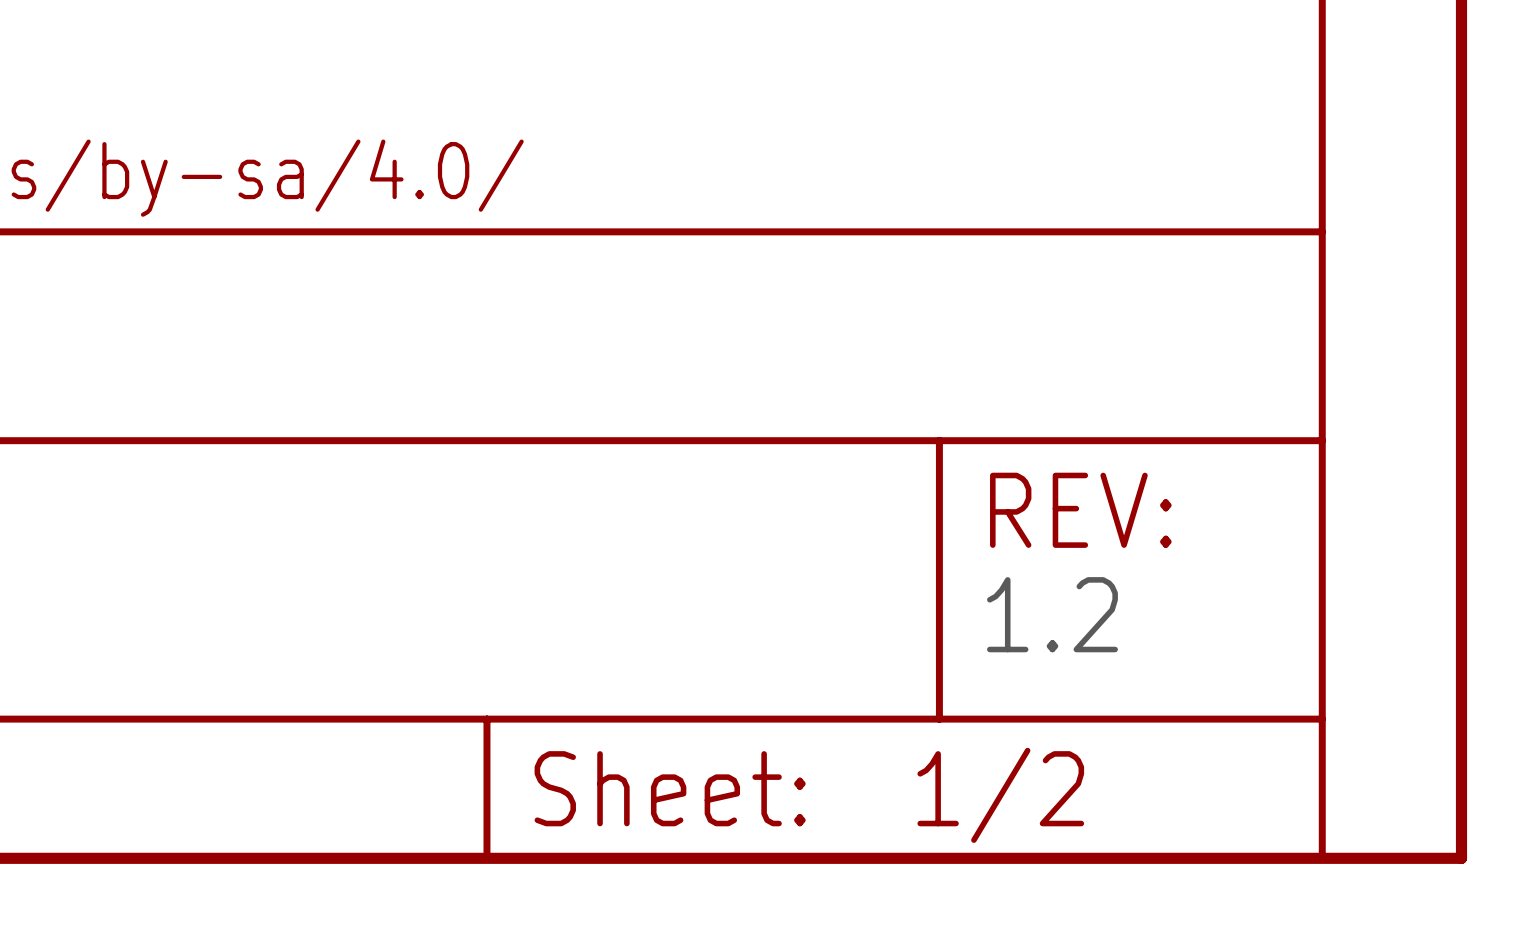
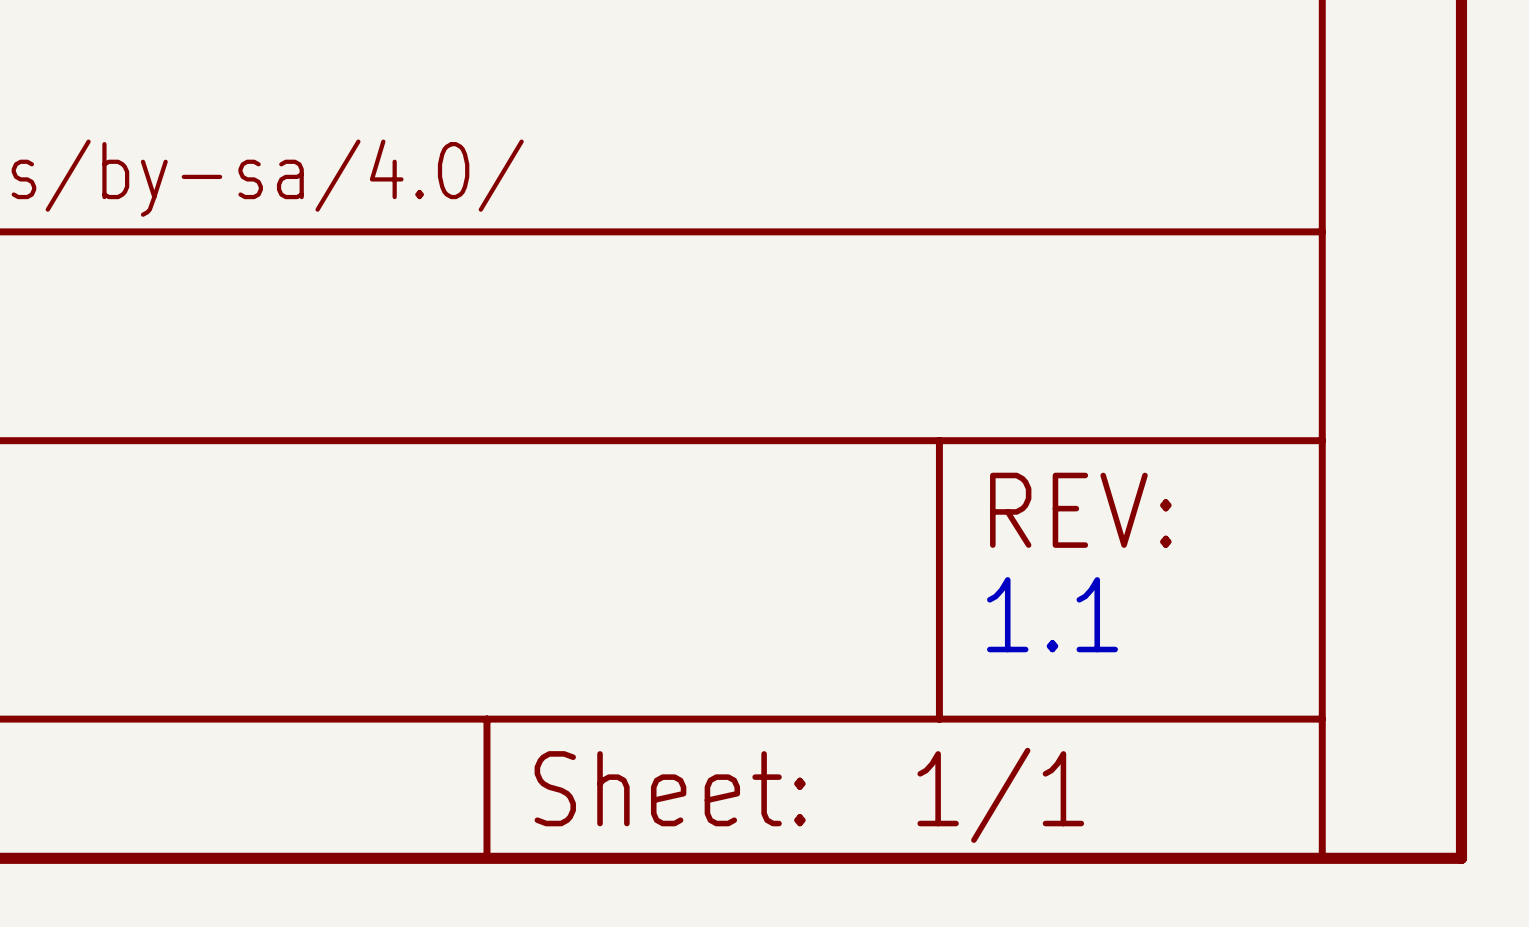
text: 1.2 (1052, 614) -> 1.1 (1052, 614)
part text: 1/2 (1000, 795) -> 1/1 (1000, 795)

